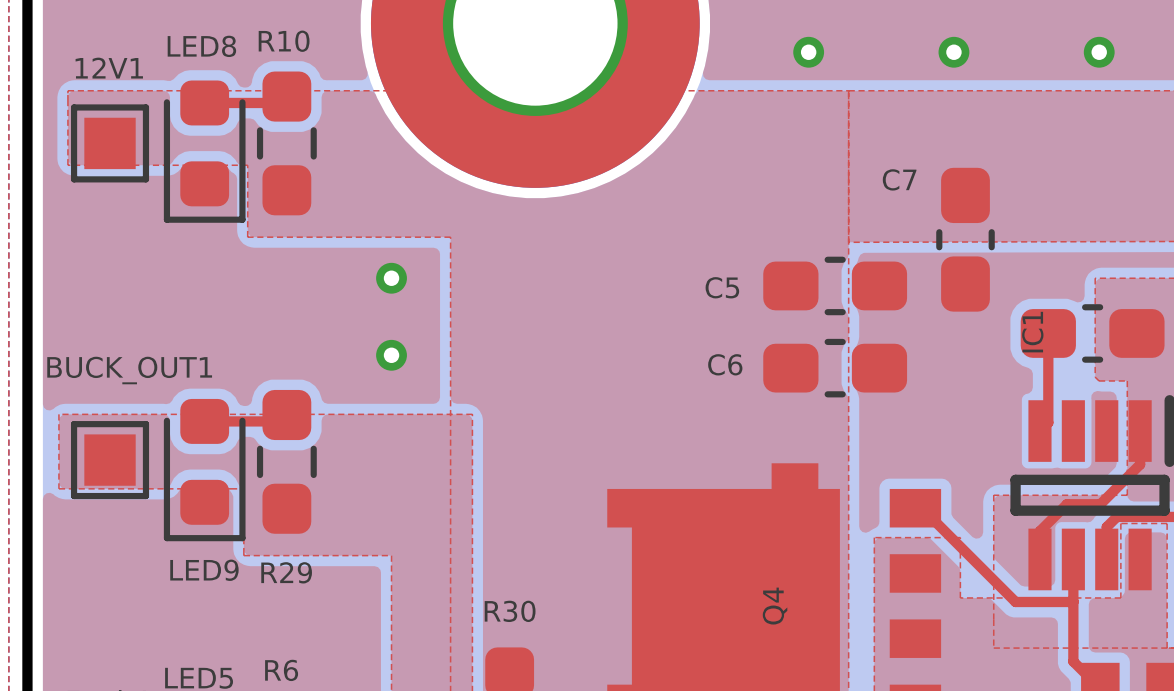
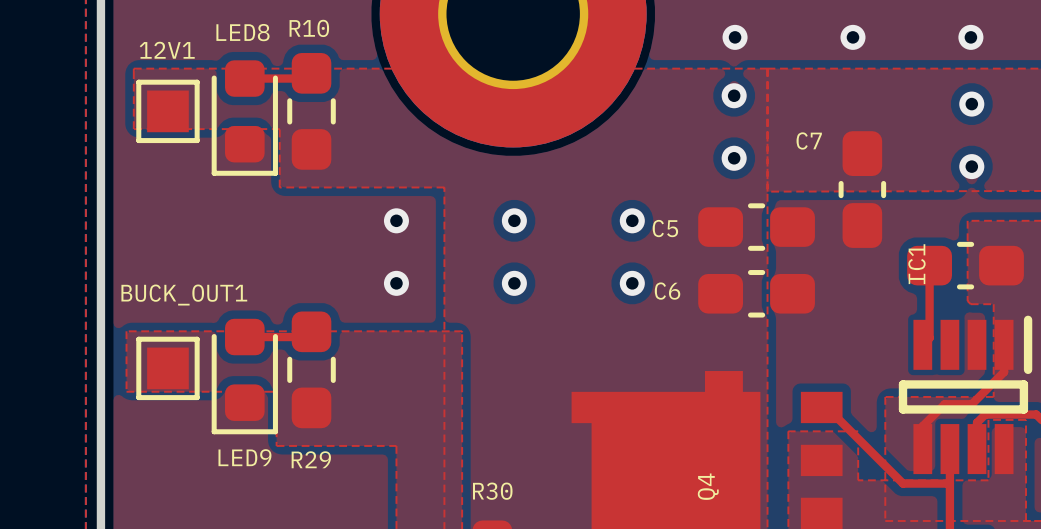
via: none -> (734, 95)
via: none -> (971, 104)
via: none -> (734, 158)
via: none -> (971, 166)
via: none -> (514, 220)
via: none -> (632, 220)
via: none -> (514, 283)
via: none -> (632, 283)

